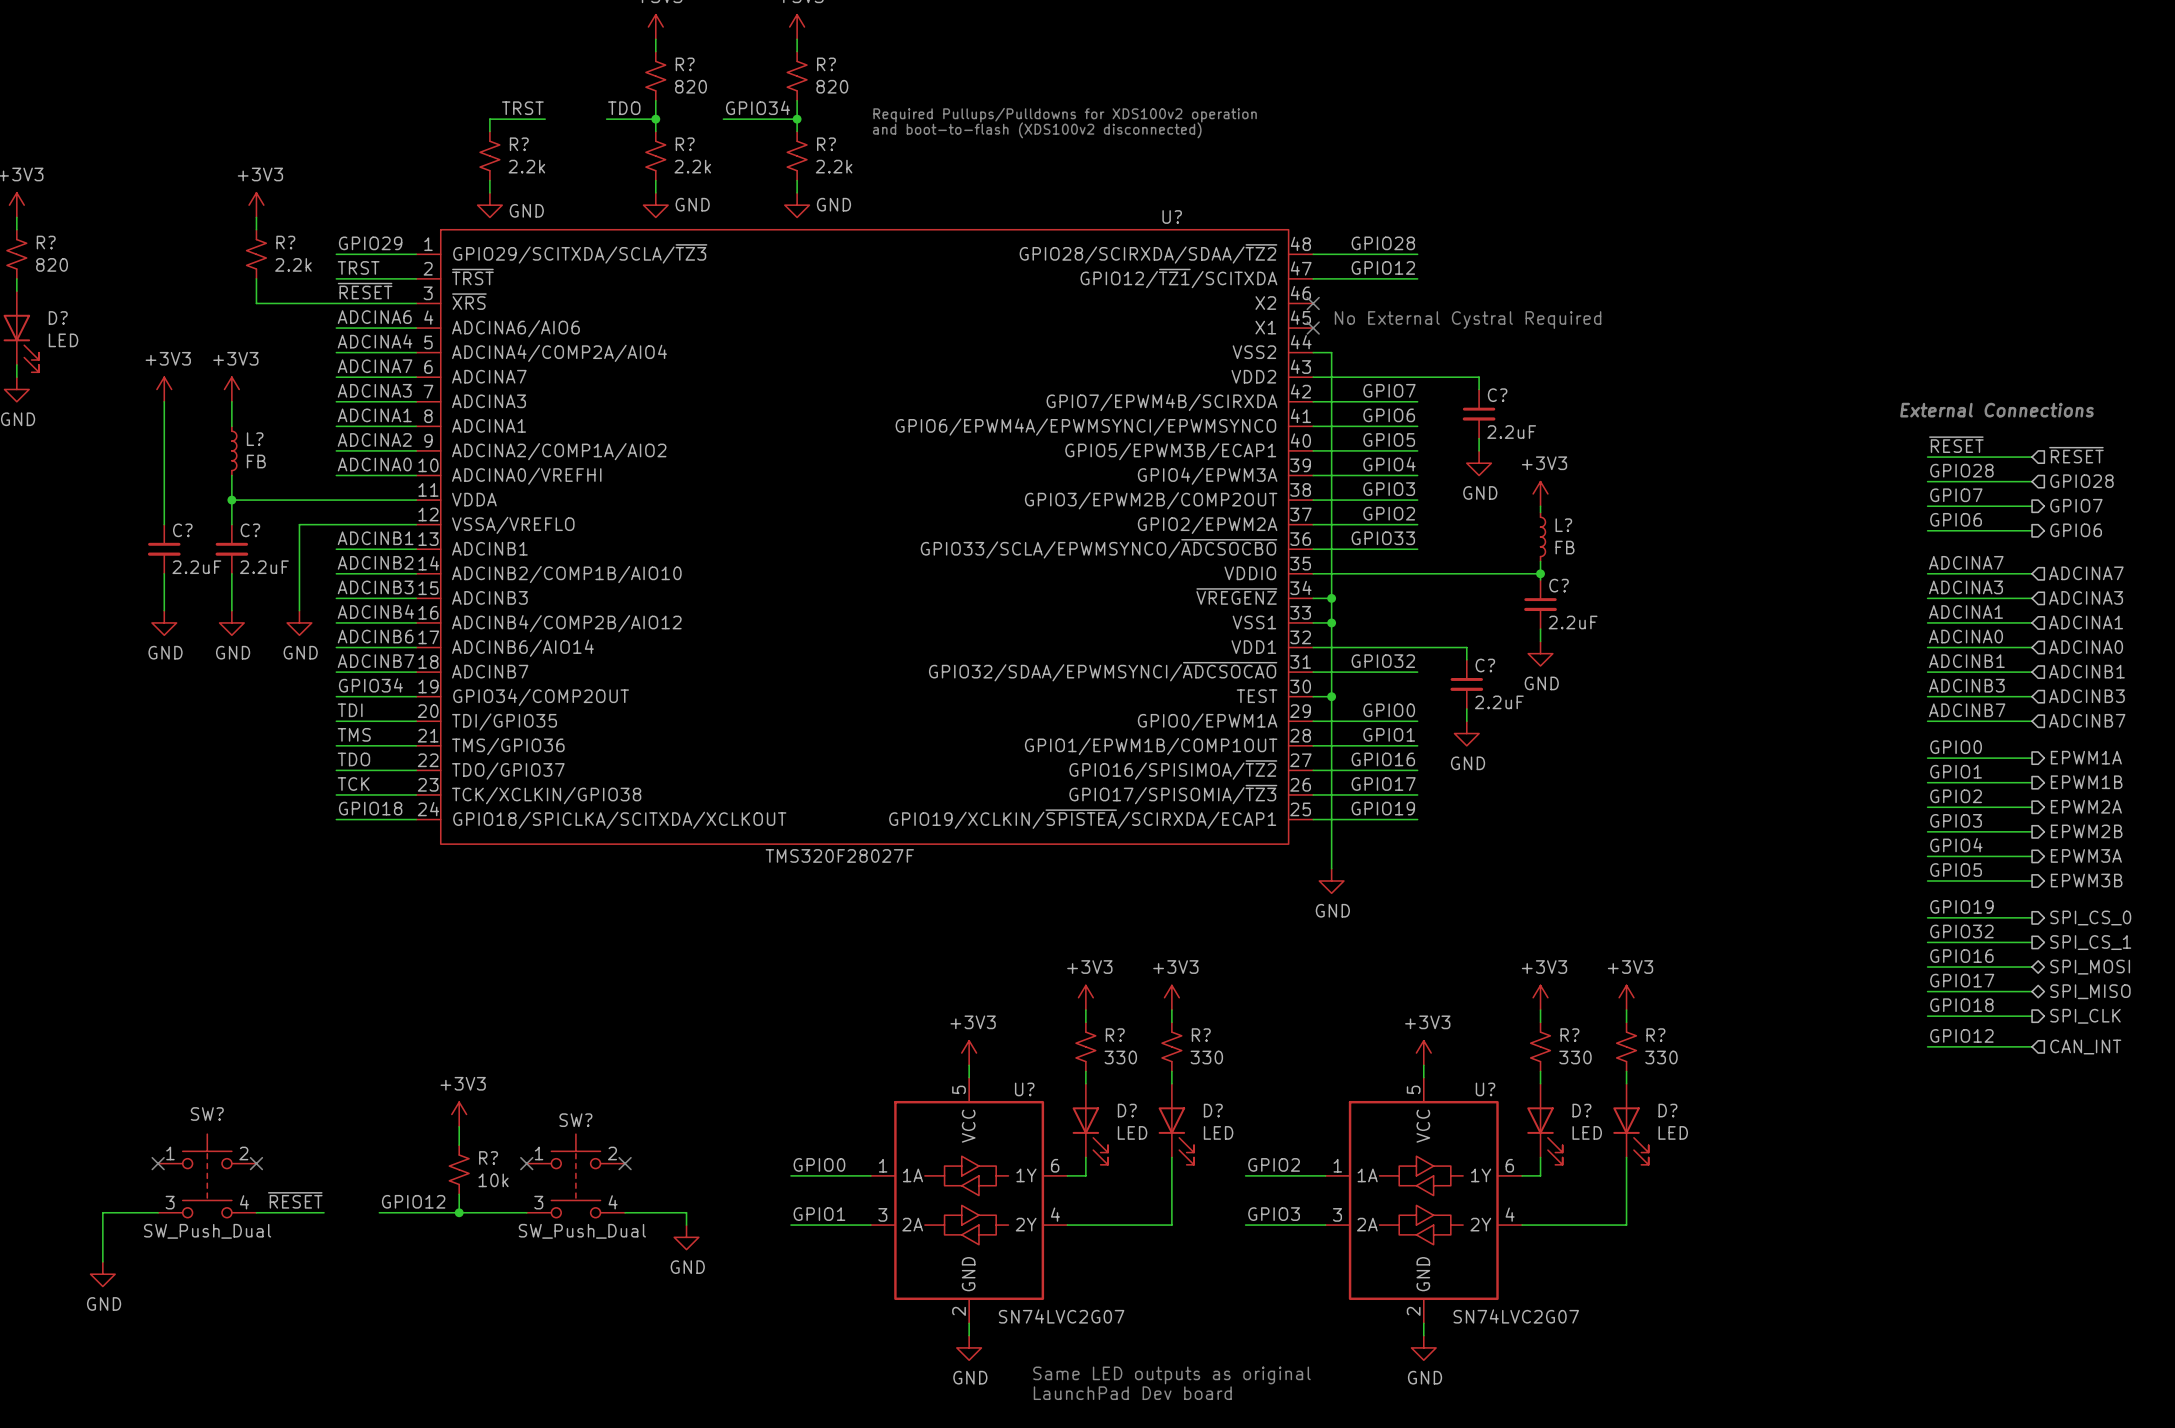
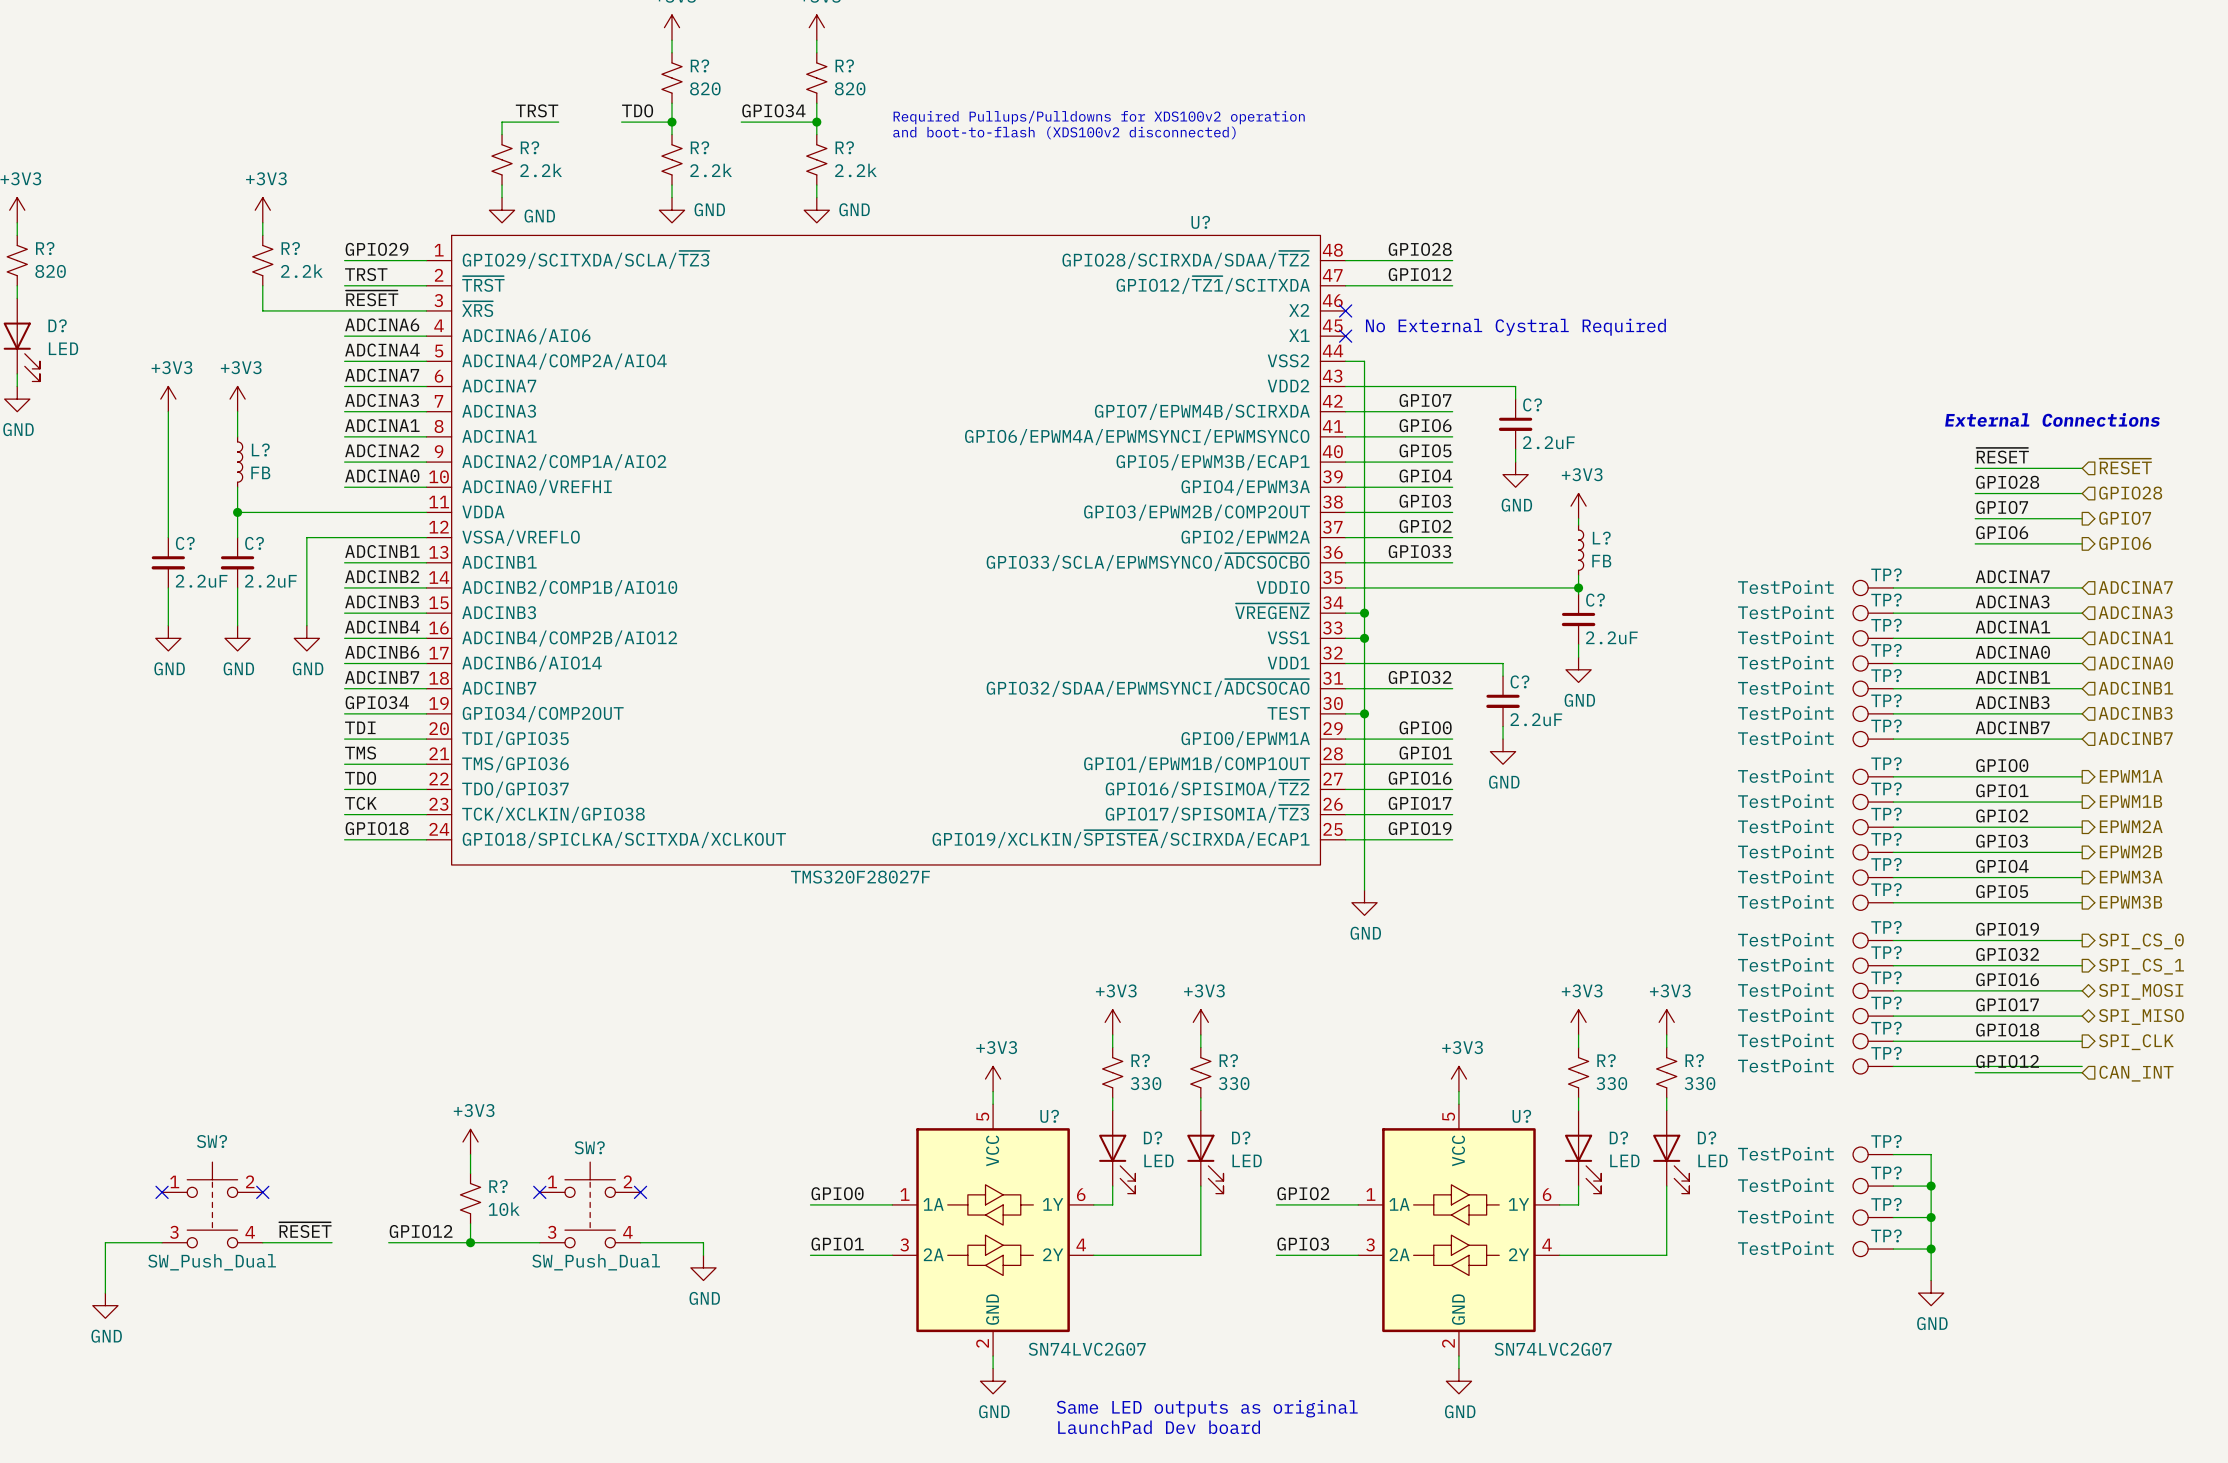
TP?: none -> TestPoint (1873, 587)
wire: none -> (1893, 587) (1975, 587)
TP?: none -> TestPoint (1873, 613)
wire: none -> (1893, 613) (1975, 613)
TP?: none -> TestPoint (1873, 638)
wire: none -> (1893, 638) (1975, 638)
TP?: none -> TestPoint (1873, 663)
wire: none -> (1893, 663) (1975, 663)
TP?: none -> TestPoint (1873, 688)
wire: none -> (1893, 688) (1975, 688)
TP?: none -> TestPoint (1873, 713)
wire: none -> (1893, 713) (1975, 713)
TP?: none -> TestPoint (1873, 739)
wire: none -> (1893, 739) (1975, 739)
TP?: none -> TestPoint (1873, 776)
wire: none -> (1893, 776) (1975, 776)
TP?: none -> TestPoint (1873, 802)
wire: none -> (1893, 802) (1975, 802)
TP?: none -> TestPoint (1873, 827)
wire: none -> (1893, 827) (1975, 827)
TP?: none -> TestPoint (1873, 852)
wire: none -> (1893, 852) (1975, 852)
TP?: none -> TestPoint (1873, 877)
wire: none -> (1893, 877) (1975, 877)
TP?: none -> TestPoint (1873, 902)
wire: none -> (1893, 902) (1975, 902)
TP?: none -> TestPoint (1873, 940)
wire: none -> (1893, 940) (1975, 940)
TP?: none -> TestPoint (1873, 965)
wire: none -> (1893, 965) (1975, 965)
TP?: none -> TestPoint (1873, 990)
wire: none -> (1893, 990) (1975, 990)
TP?: none -> TestPoint (1873, 1016)
wire: none -> (1893, 1016) (1975, 1016)
TP?: none -> TestPoint (1873, 1041)
wire: none -> (1893, 1041) (1975, 1041)
TP?: none -> TestPoint (1873, 1066)
wire: none -> (1893, 1066) (2082, 1066)
TP?: none -> TestPoint (1873, 1154)
wire: none -> (1893, 1154) (1931, 1154) (1931, 1280)
TP?: none -> TestPoint (1873, 1186)
wire: none -> (1893, 1186) (1931, 1186)
junction: none -> (1931, 1186)
TP?: none -> TestPoint (1873, 1217)
wire: none -> (1893, 1217) (1931, 1217)
junction: none -> (1931, 1217)
TP?: none -> TestPoint (1873, 1249)
wire: none -> (1893, 1249) (1931, 1249)
junction: none -> (1931, 1249)
power symbol: none -> GND (1931, 1293)

